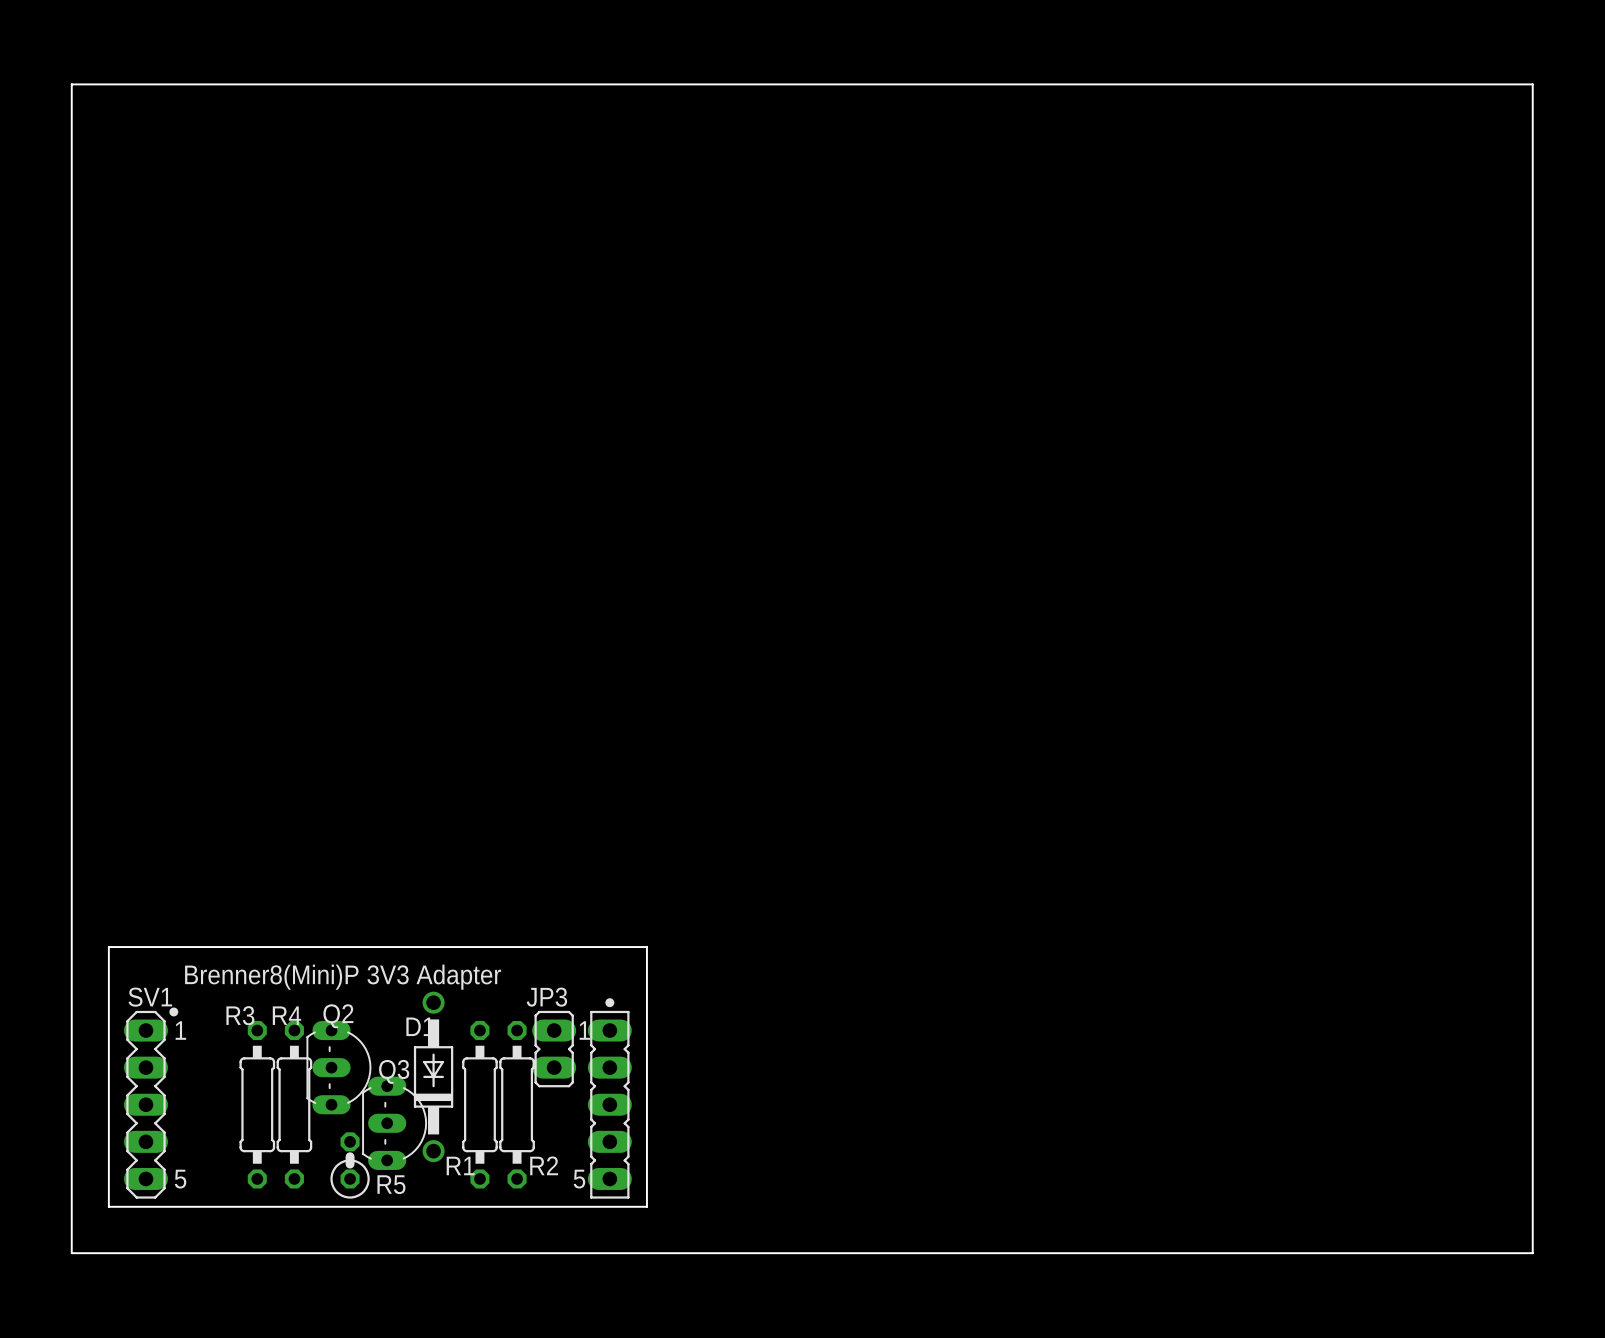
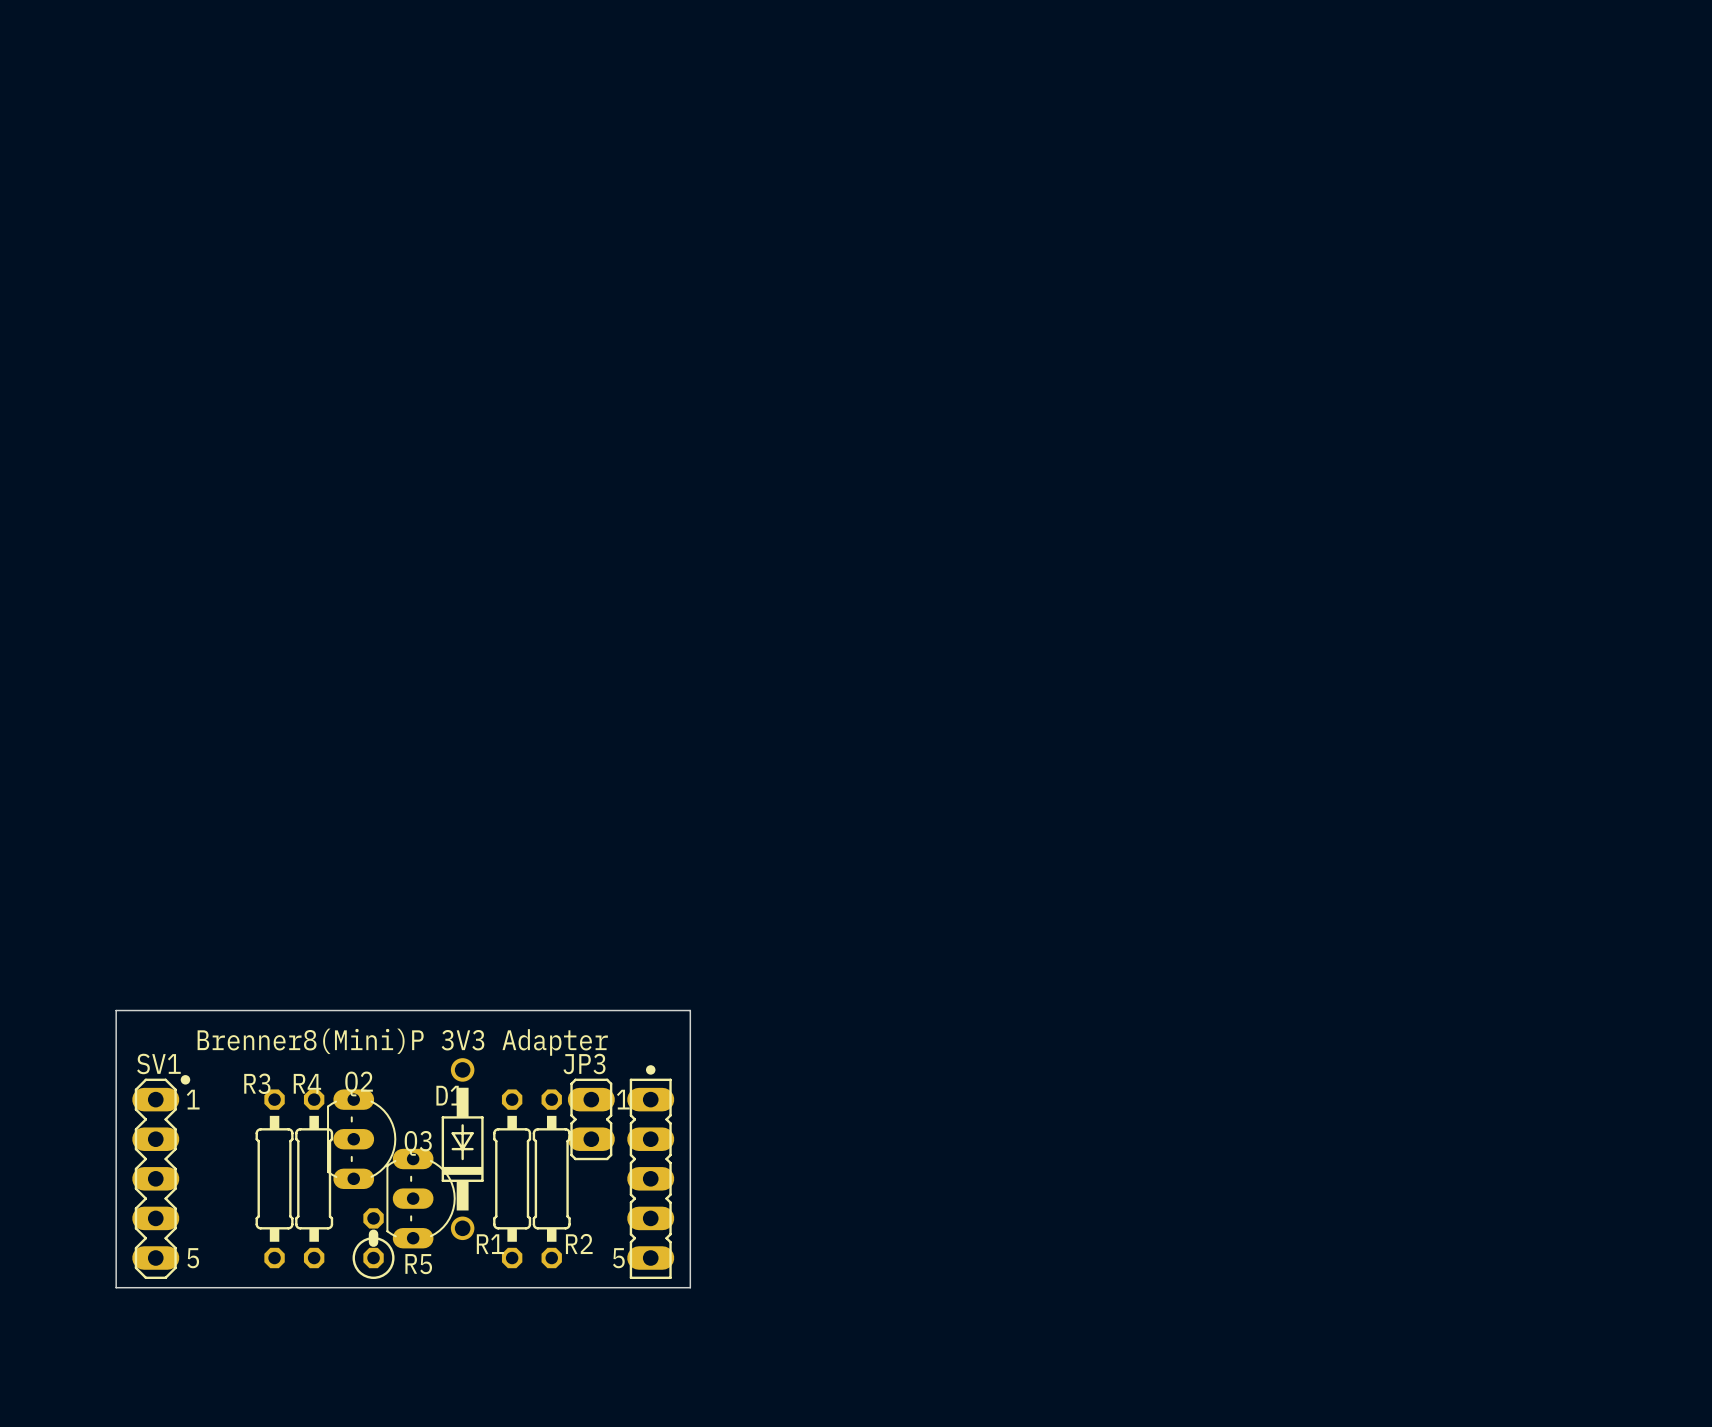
board edge: (71, 84) (1532, 84) (1532, 1253) (71, 1253) (71, 84) -> none

